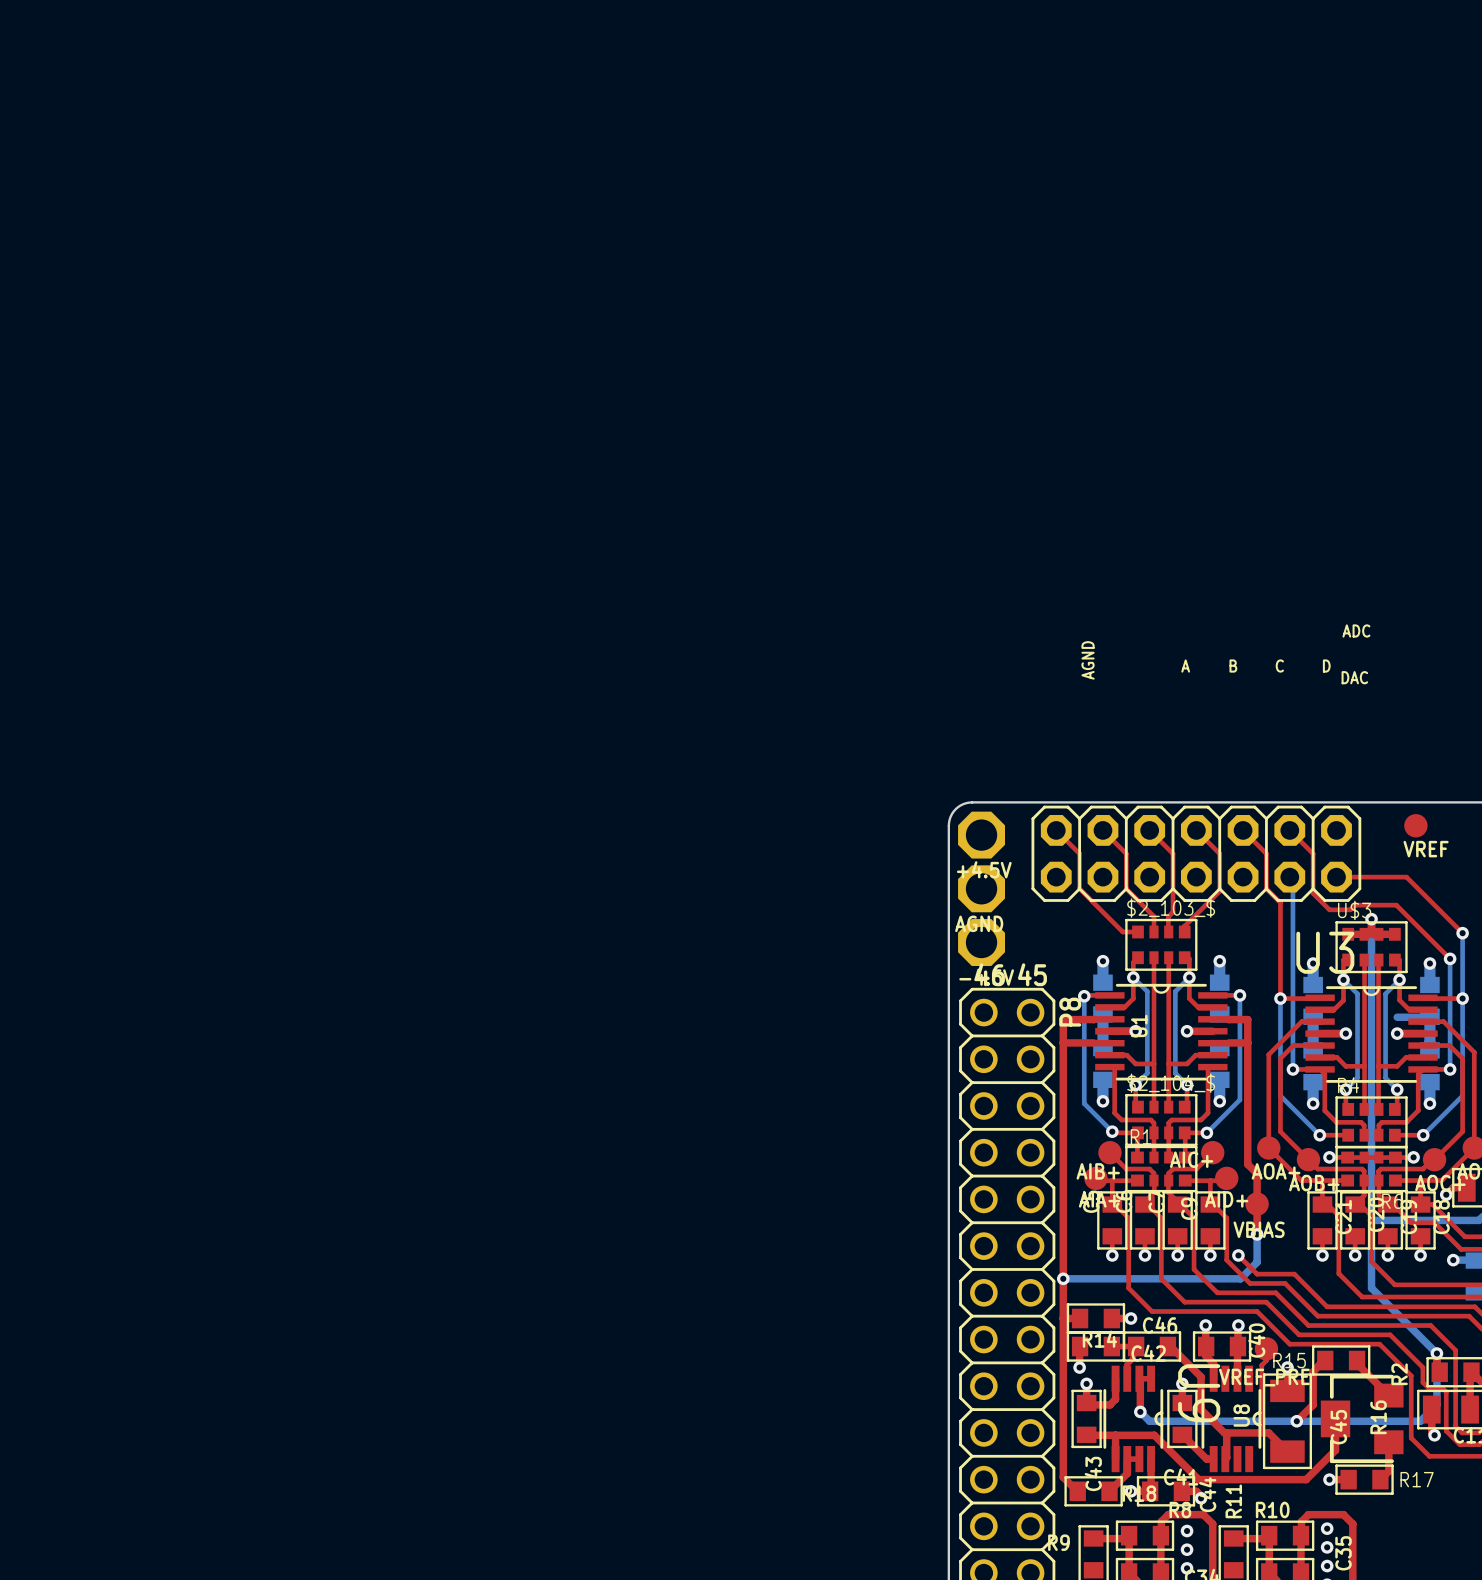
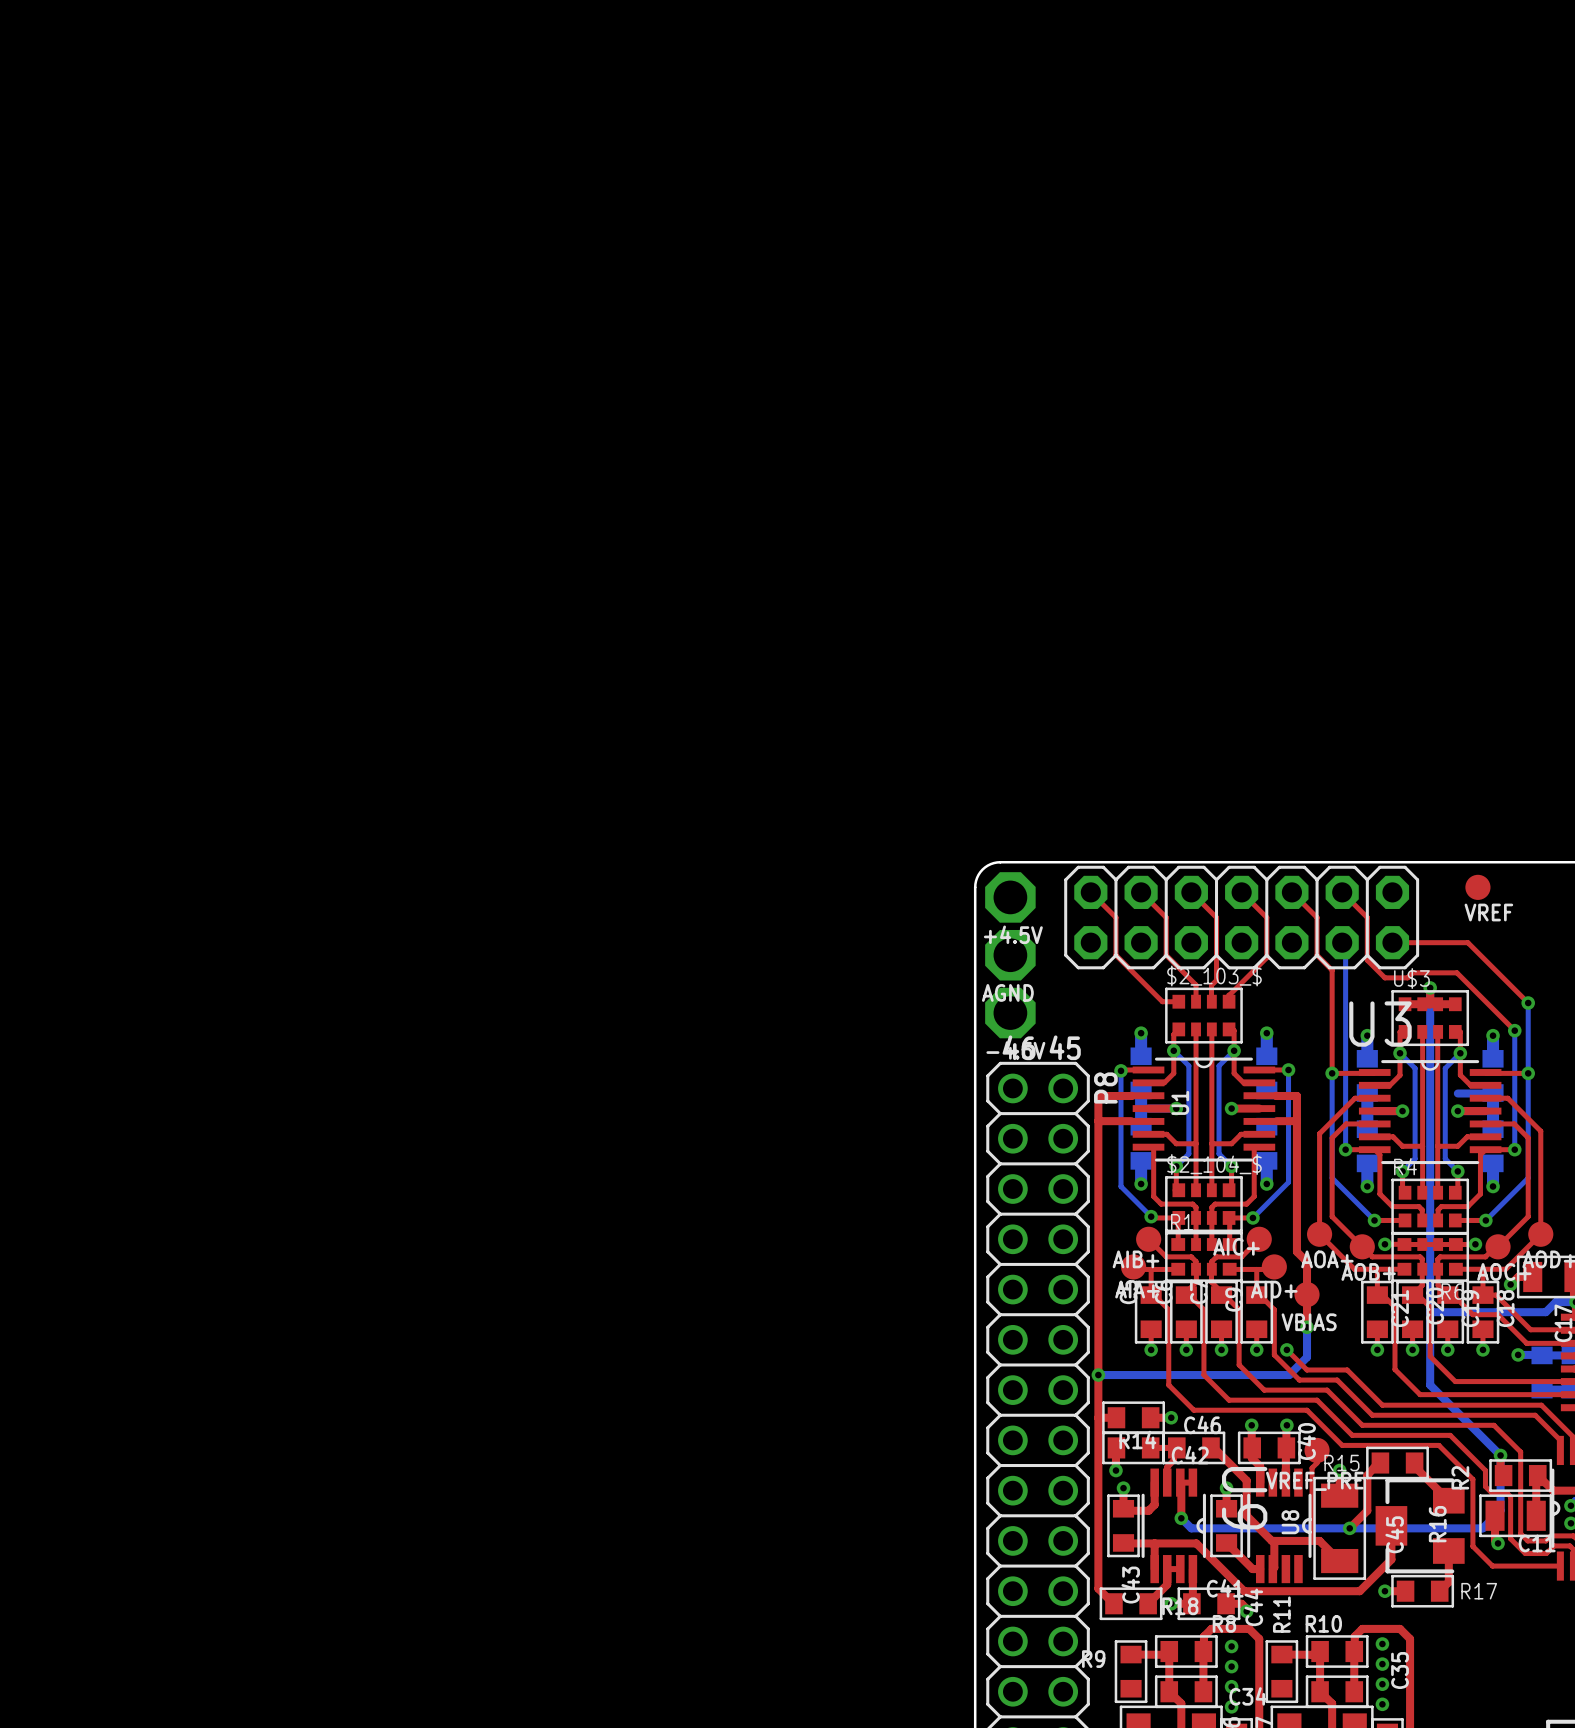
text: ADC (1356, 630) -> none
text: AGND (1088, 660) -> none
text: A (1185, 666) -> none
text: B (1233, 666) -> none
text: C (1279, 666) -> none
text: D (1326, 666) -> none
text: DAC (1354, 677) -> none

